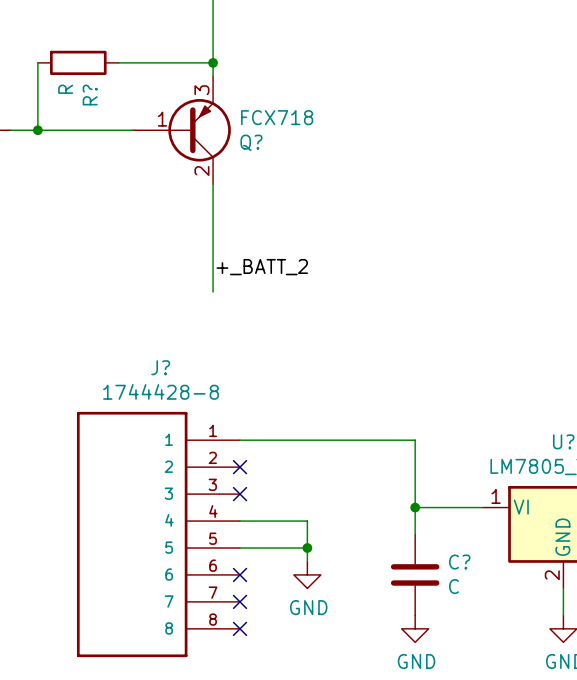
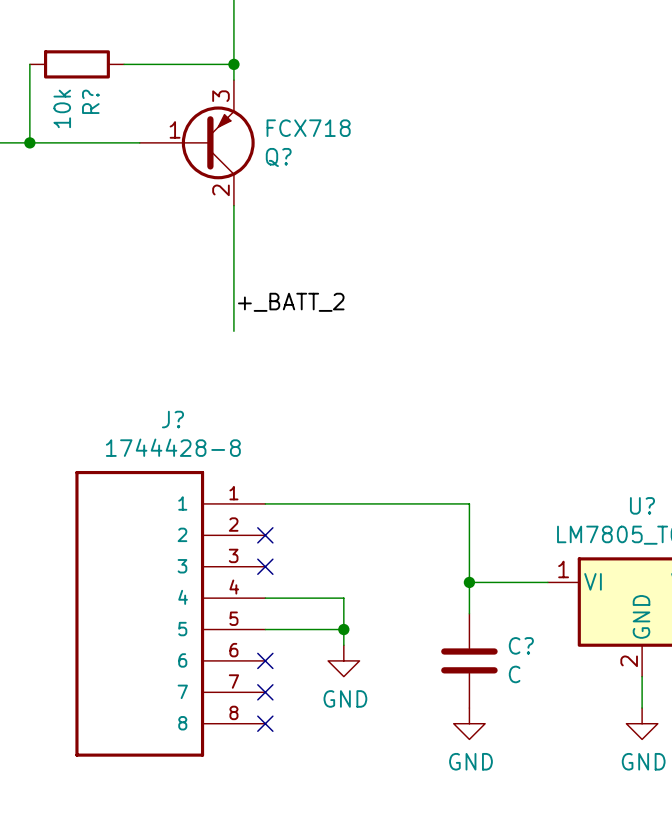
R? value: R (65, 89) -> 10k (62, 108)

